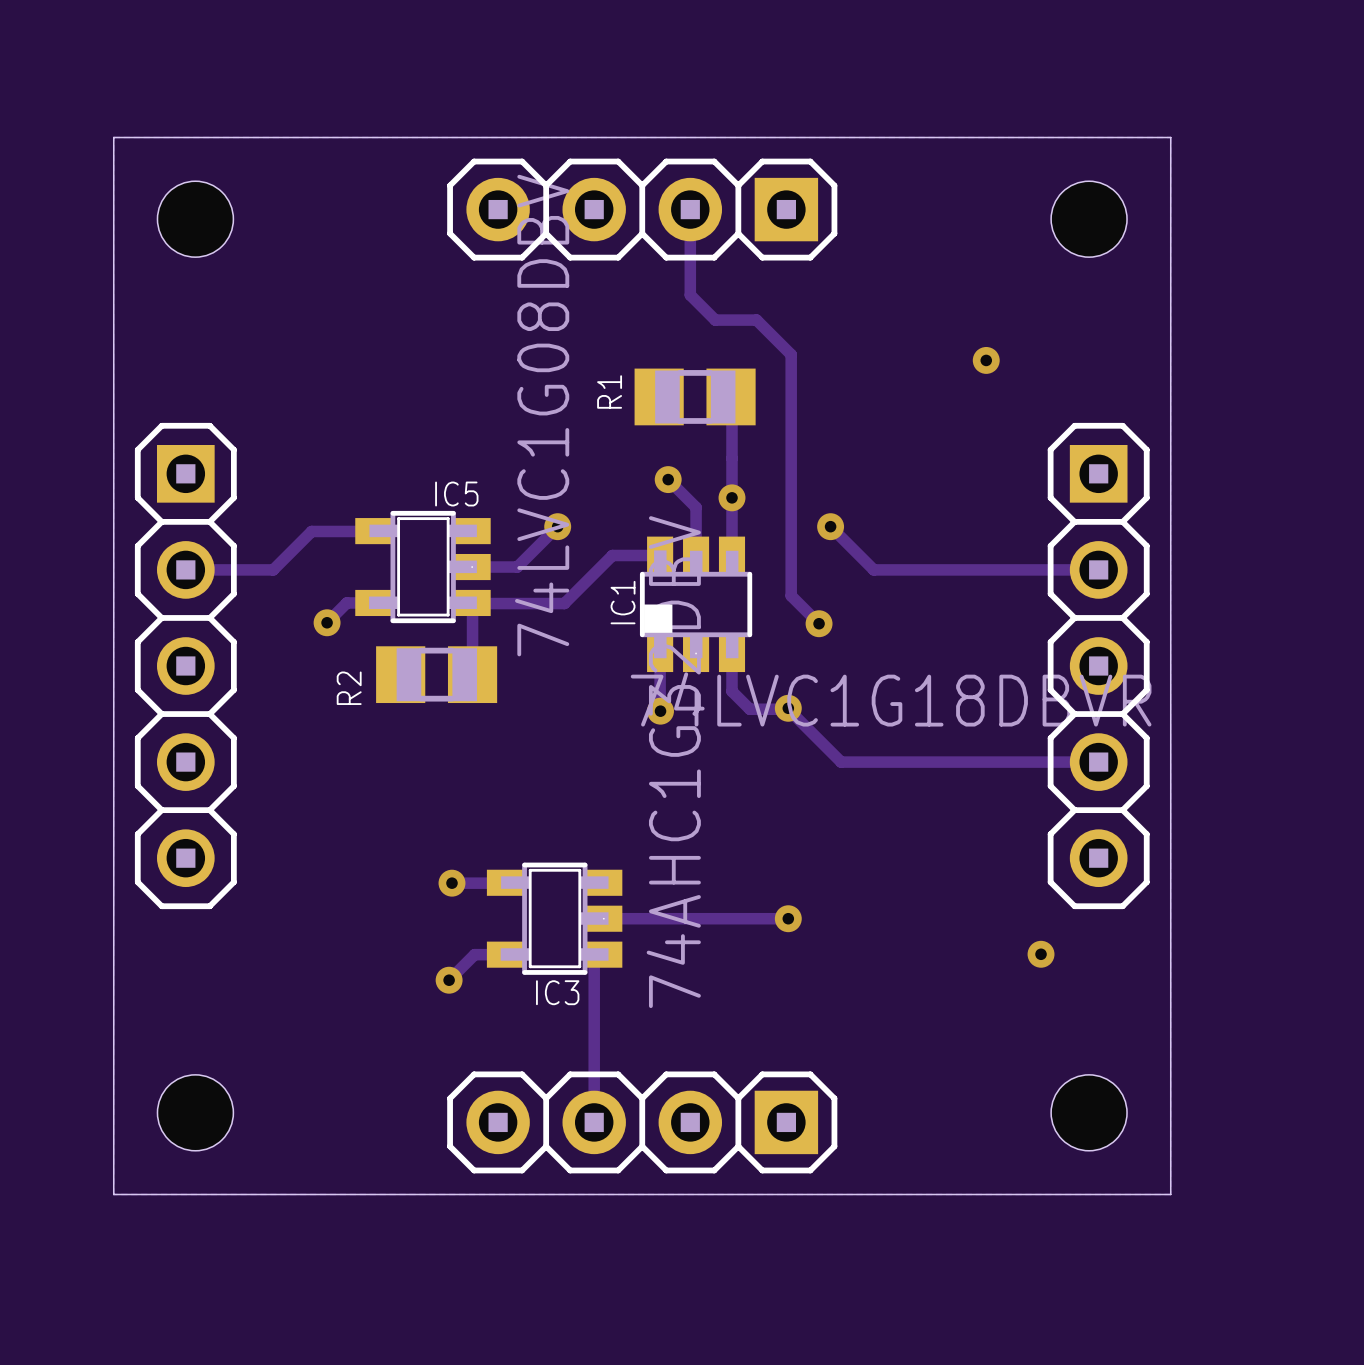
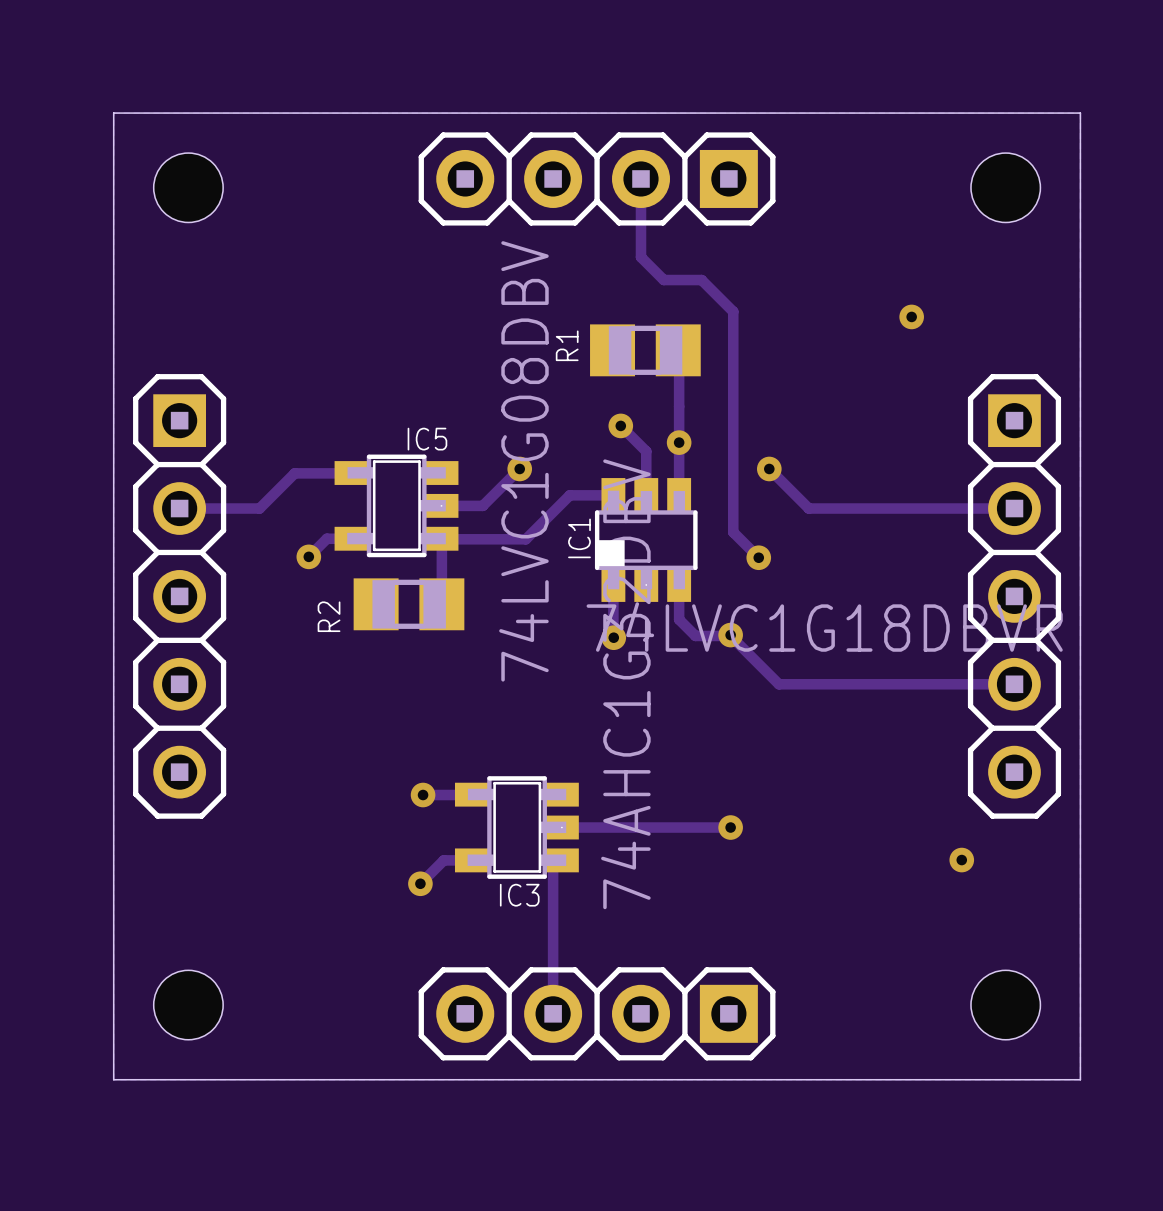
IC5 value position: 74LVC1G08DBV (542, 415) -> 74LVC1G08DBV (523, 461)

